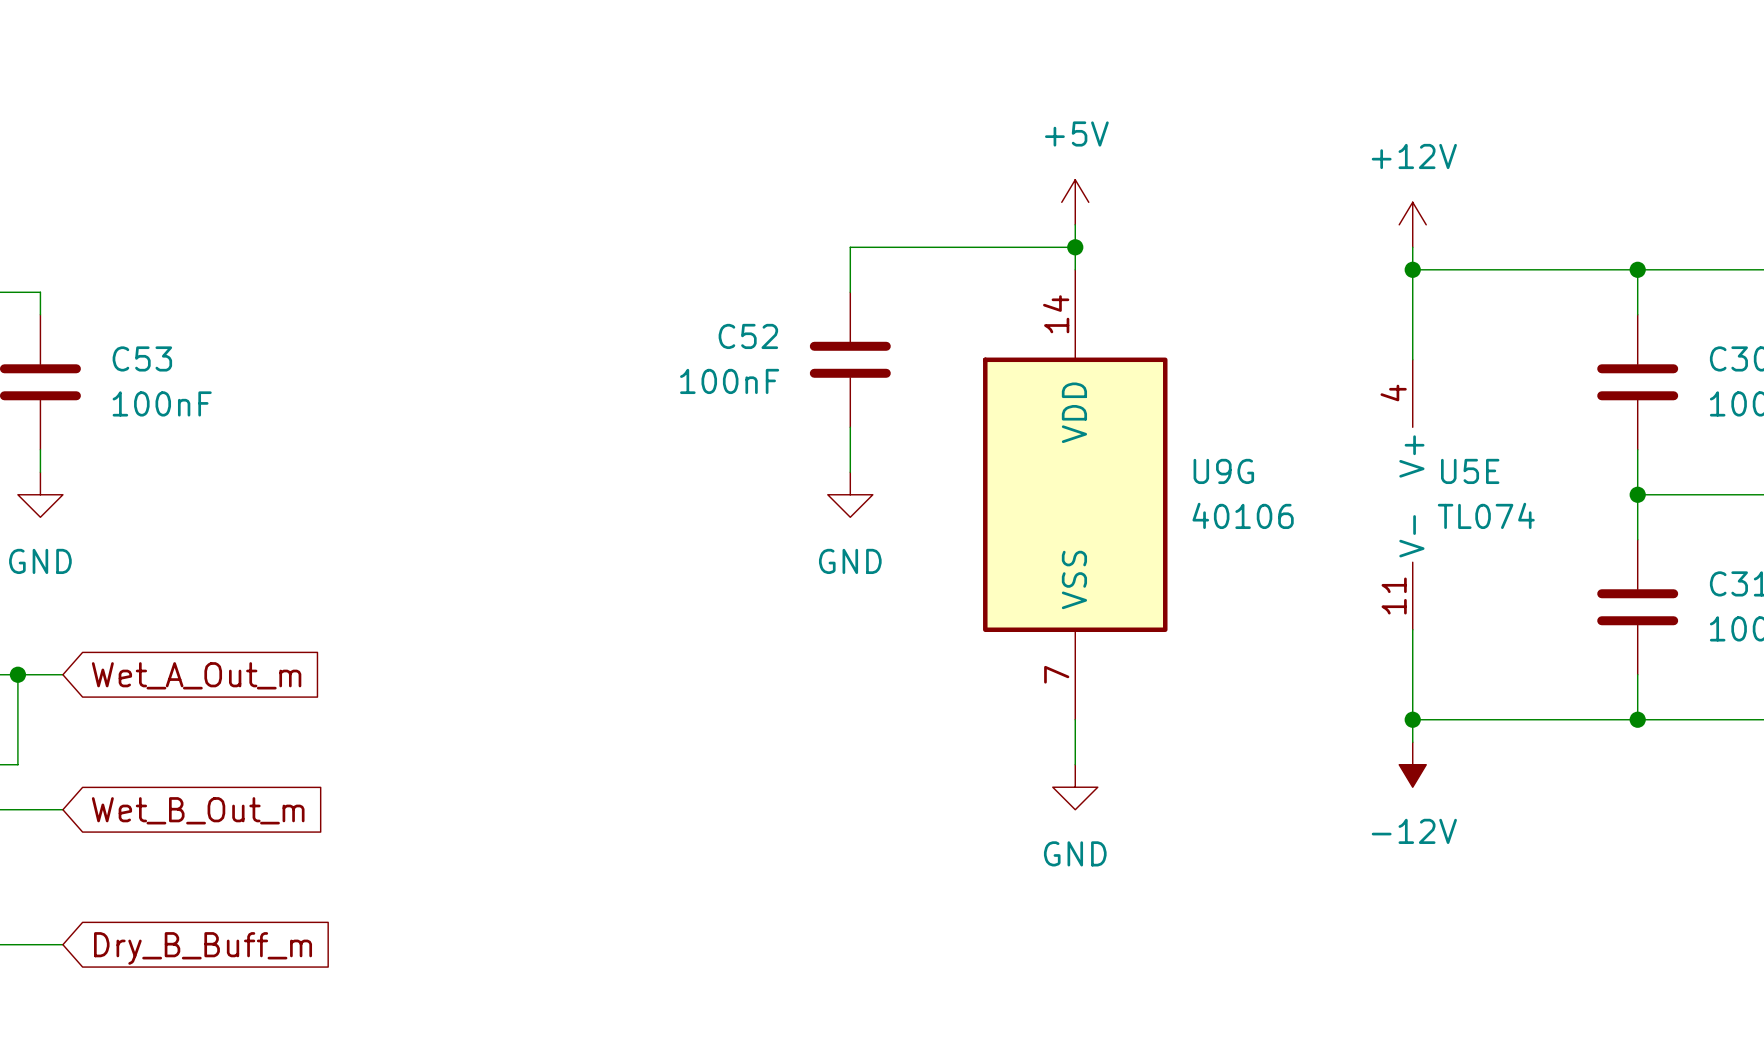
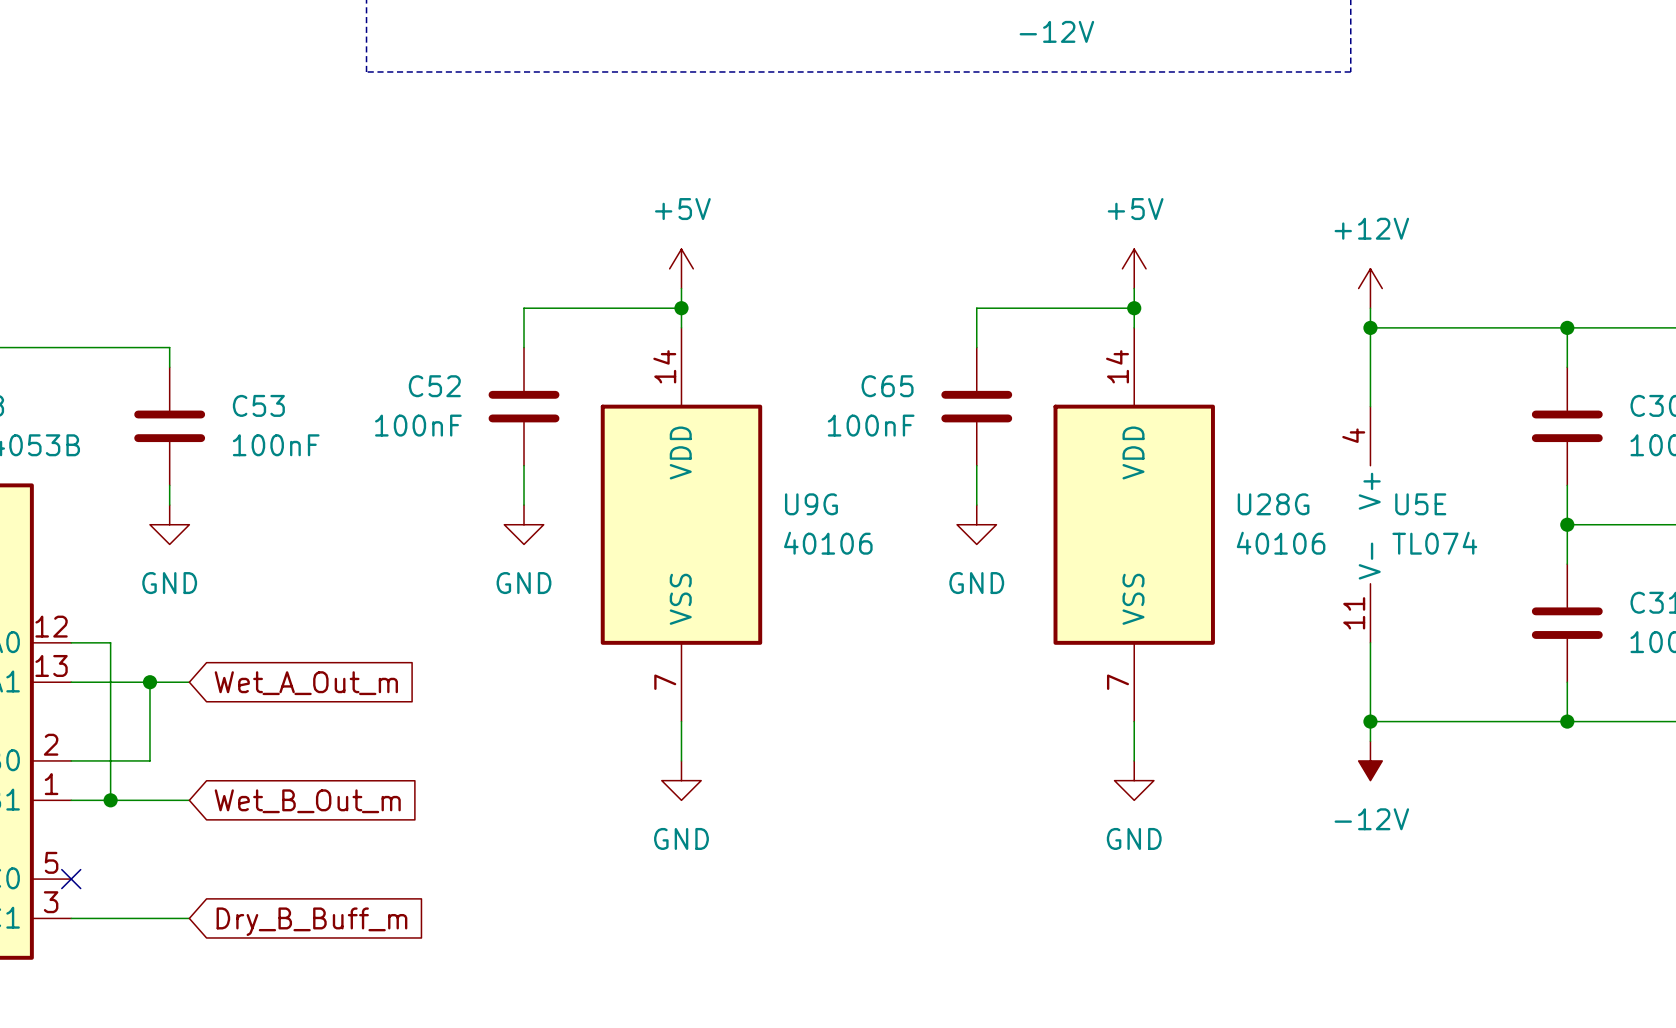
power symbol: none -> +5V (681, 268)
power symbol position: +5V (1075, 202) -> +5V (1134, 268)
wire: none -> (681, 288) (681, 327)
wire: (1075, 224) (1075, 269) -> (1134, 288) (1134, 327)
wire: none -> (681, 308) (524, 308) (524, 347)
junction: none -> (681, 308)
wire: (962, 247) (850, 247) (850, 292) -> (976, 308) (976, 347)
wire: none -> (1075, 308) (1134, 308)
junction position: (1075, 247) -> (1134, 308)
C52 position: (850, 359) -> (524, 406)
C65: none -> 100nF (976, 406)
wire: none -> (524, 465) (524, 505)
wire: (850, 427) (850, 472) -> (976, 465) (976, 505)
power symbol: none -> GND (524, 524)
power symbol position: GND (850, 494) -> GND (976, 524)
U9G position: (1075, 494) -> (681, 524)
U28G: none -> 40106 (1134, 524)
wire: none -> (681, 721) (681, 760)
wire: (1075, 719) (1075, 764) -> (1134, 721) (1134, 760)
power symbol: none -> GND (681, 780)
power symbol position: GND (1075, 787) -> GND (1134, 780)

